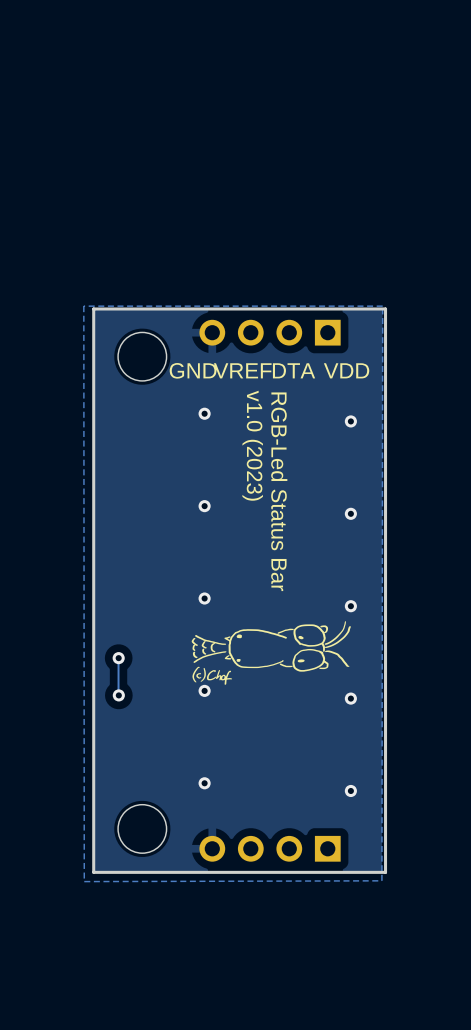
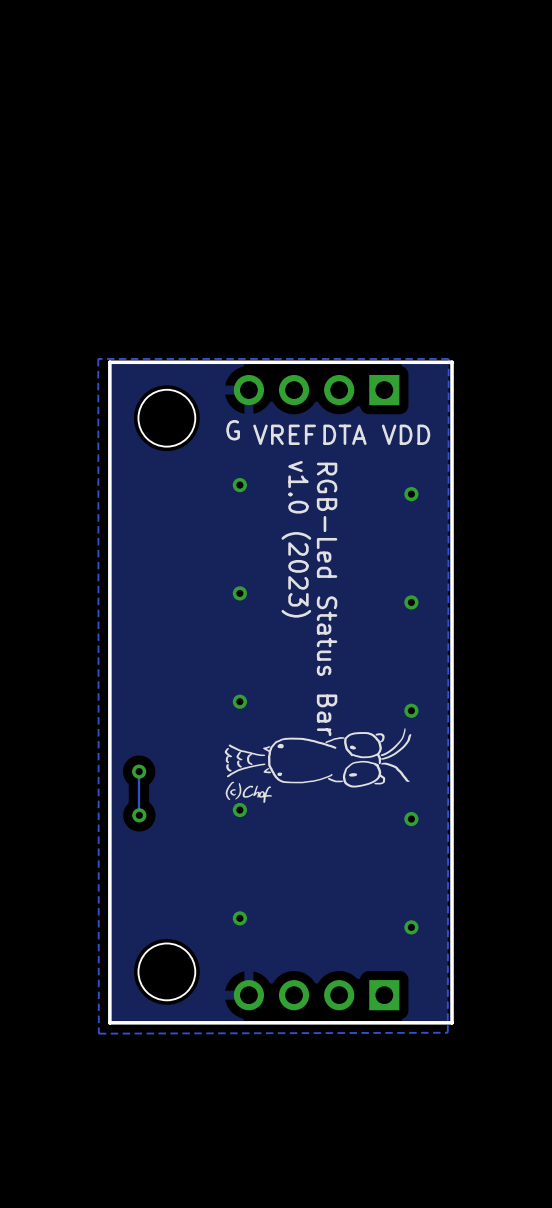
text: GND (193, 370) -> G (233, 430)

